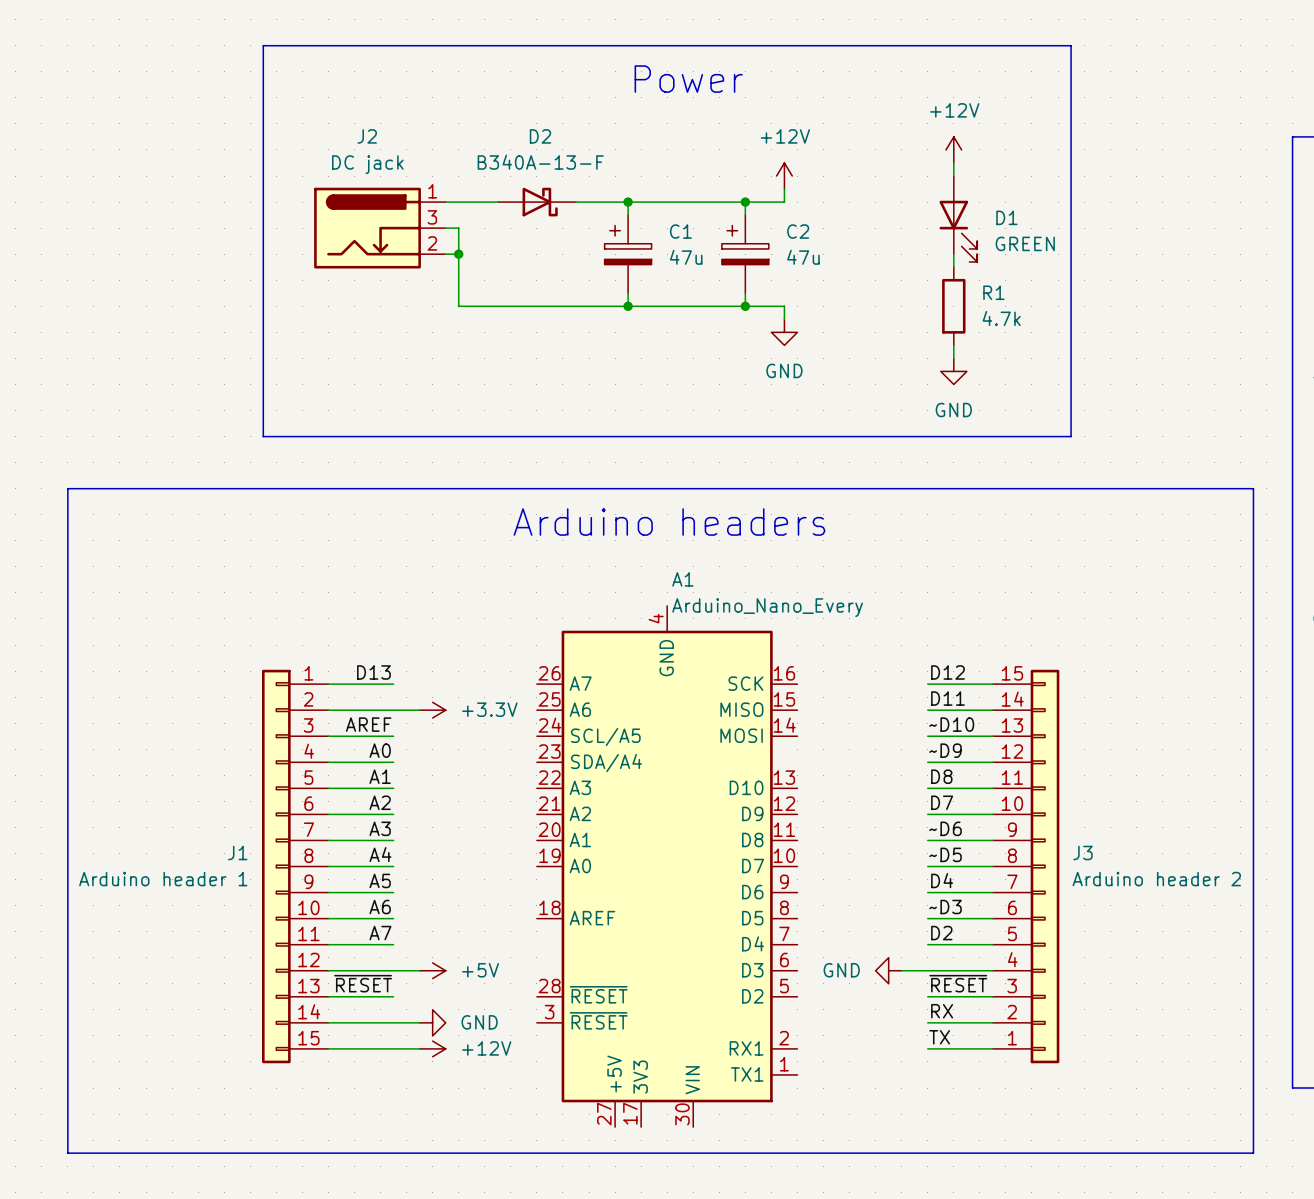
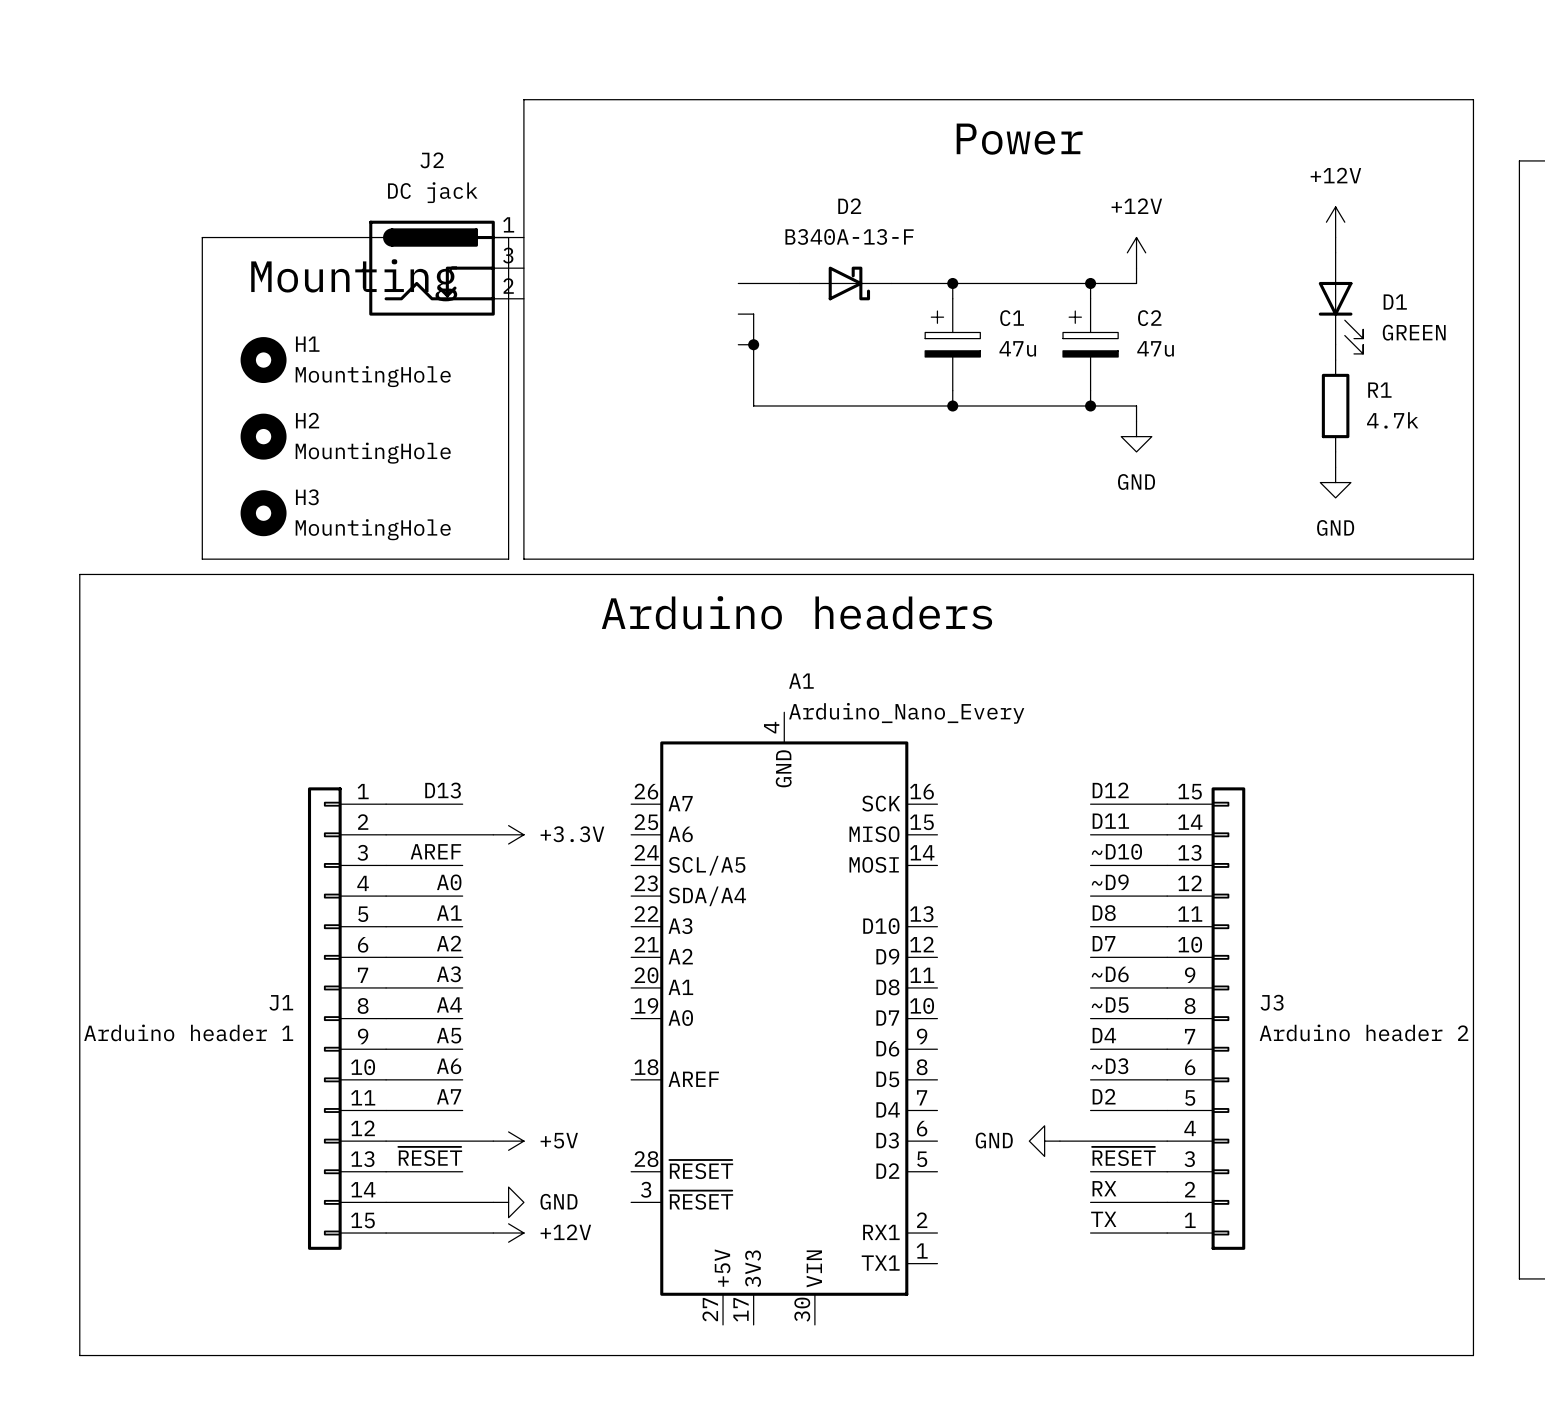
line: (263, 45) (1071, 45) (1071, 436) (263, 436) (263, 45) -> (523, 99) (1473, 99) (1473, 559) (523, 559) (523, 99)
text position: Power (688, 79) -> Power (1019, 139)
power symbol position: +12V (953, 149) -> +12V (1136, 252)
wire: (953, 162) (953, 176) -> (1335, 237) (1335, 252)
power symbol: +12V (784, 176) -> none
wire: (784, 189) (784, 202) (575, 202) -> (1136, 268) (1136, 283) (891, 283)
power symbol: none -> +12V (1335, 222)
line: none -> (202, 237) (508, 237) (508, 559) (202, 559) (202, 237)
wire: (445, 202) (497, 202) -> (738, 283) (799, 283)
D2 position: (536, 202) -> (845, 283)
wire: (628, 202) (628, 215) -> (952, 283) (952, 298)
junction: (628, 202) -> none
wire: (745, 202) (745, 215) -> (1090, 283) (1090, 298)
junction: (745, 202) -> none
D1 position: (958, 219) -> (1340, 303)
wire: (445, 228) (458, 228) (458, 306) (784, 306) (784, 319) -> (738, 314) (753, 314) (753, 405) (1136, 405) (1136, 421)
text: none -> Mounting (354, 280)
junction: none -> (952, 283)
junction: none -> (1090, 283)
wire: (445, 254) (458, 254) -> none
junction: (458, 254) -> none
C1 position: (628, 254) -> (952, 344)
C2 position: (745, 254) -> (1090, 344)
wire: (953, 254) (953, 267) -> (1335, 344) (1335, 360)
wire: (628, 293) (628, 306) -> (738, 344) (753, 344)
wire: (745, 293) (745, 306) -> (1090, 390) (1090, 405)
H1: none -> MountingHole (263, 360)
junction position: (628, 306) -> (753, 344)
junction: (745, 306) -> none
R1 position: (953, 306) -> (1335, 405)
power symbol: GND (784, 332) -> none
wire: none -> (952, 390) (952, 405)
junction: none -> (952, 405)
junction: none -> (1090, 405)
wire: (953, 345) (953, 358) -> (1335, 451) (1335, 467)
H2: none -> MountingHole (263, 436)
power symbol position: GND (953, 371) -> GND (1136, 436)
power symbol: none -> GND (1335, 482)
H3: none -> MountingHole (263, 513)

